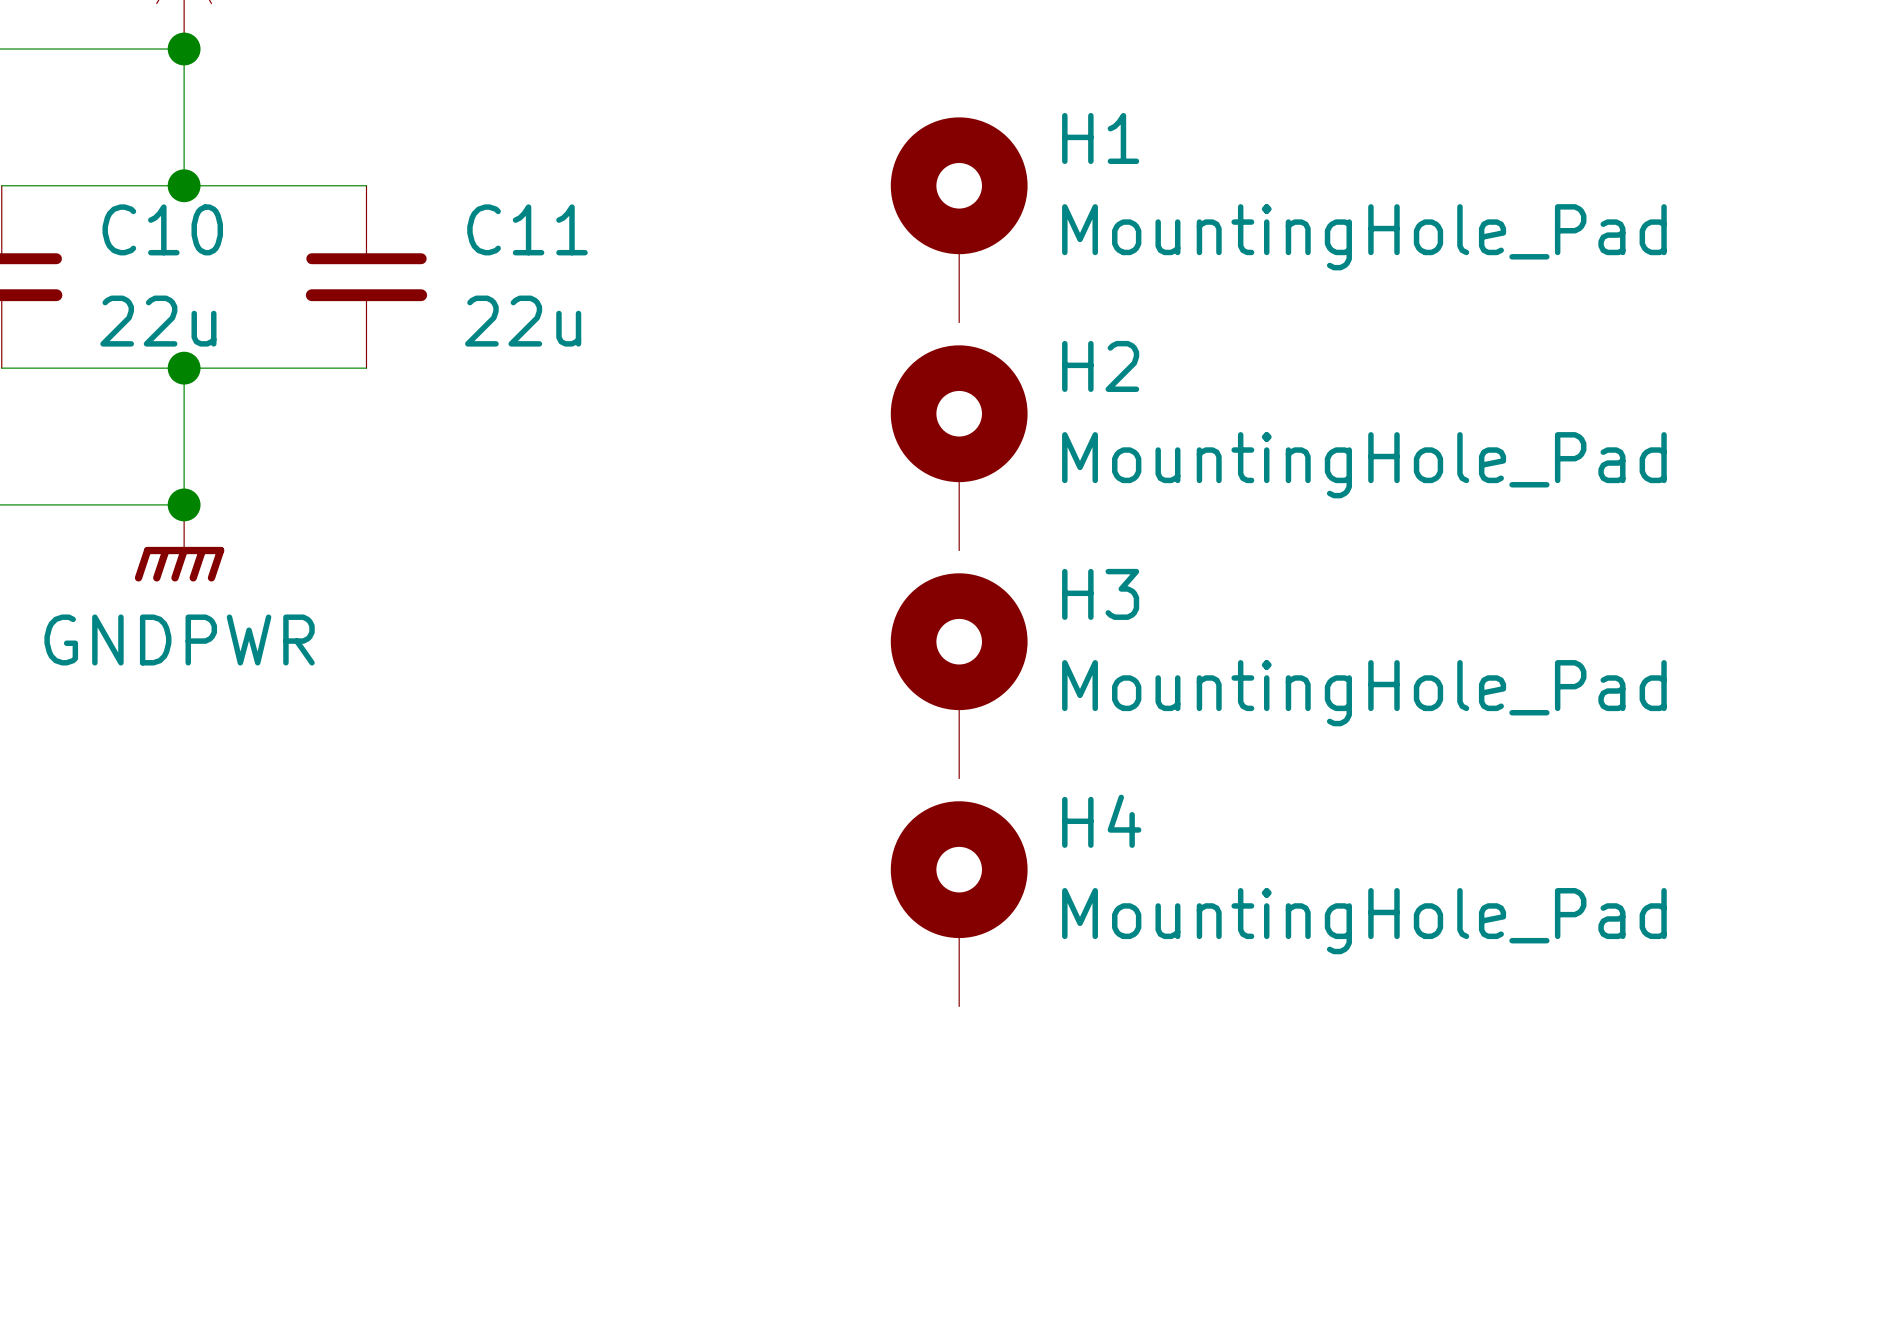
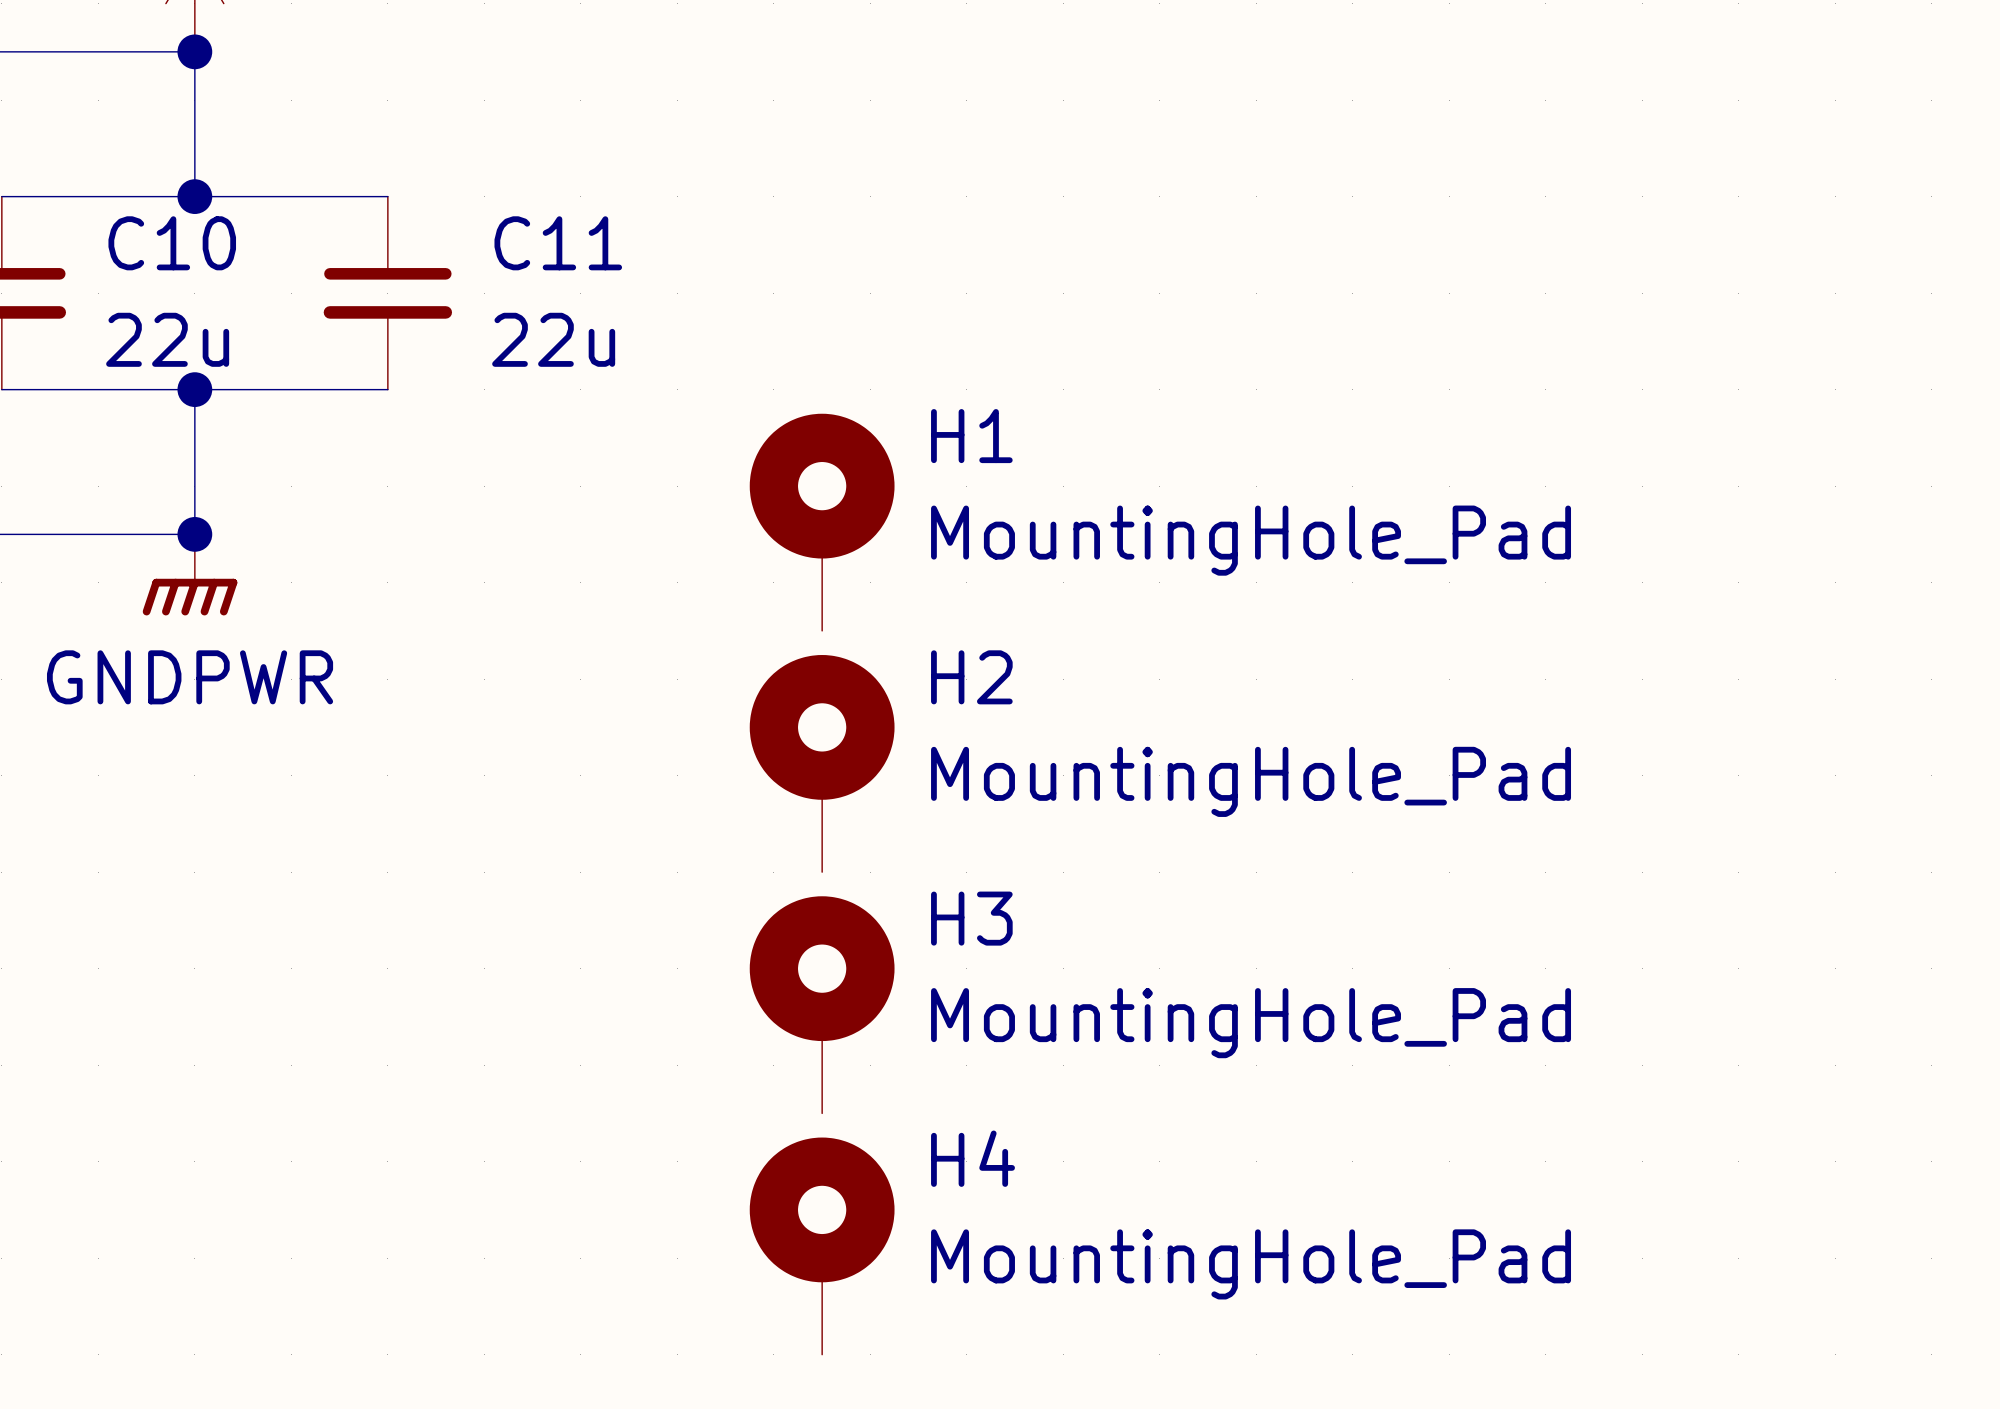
H1 position: (959, 219) -> (822, 522)
H2 position: (959, 447) -> (822, 763)
H3 position: (959, 675) -> (822, 1004)
H4 position: (959, 903) -> (822, 1246)

